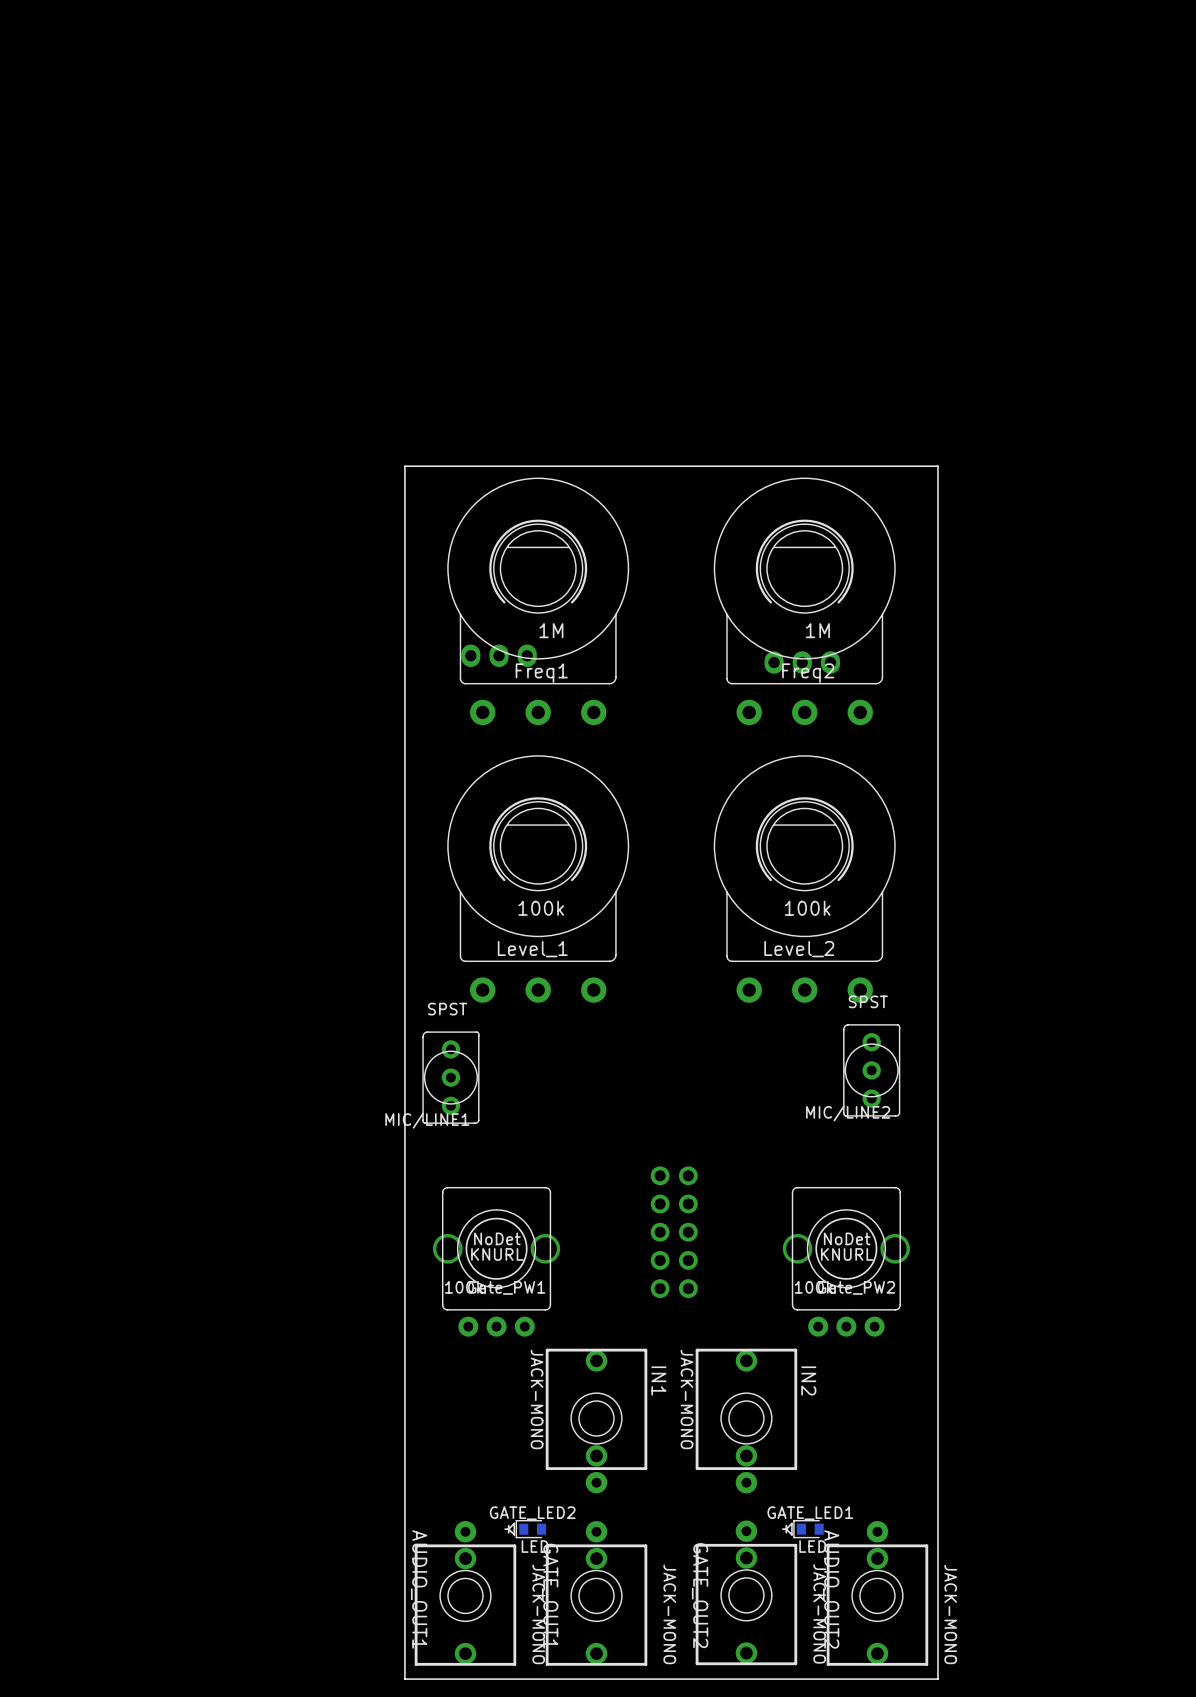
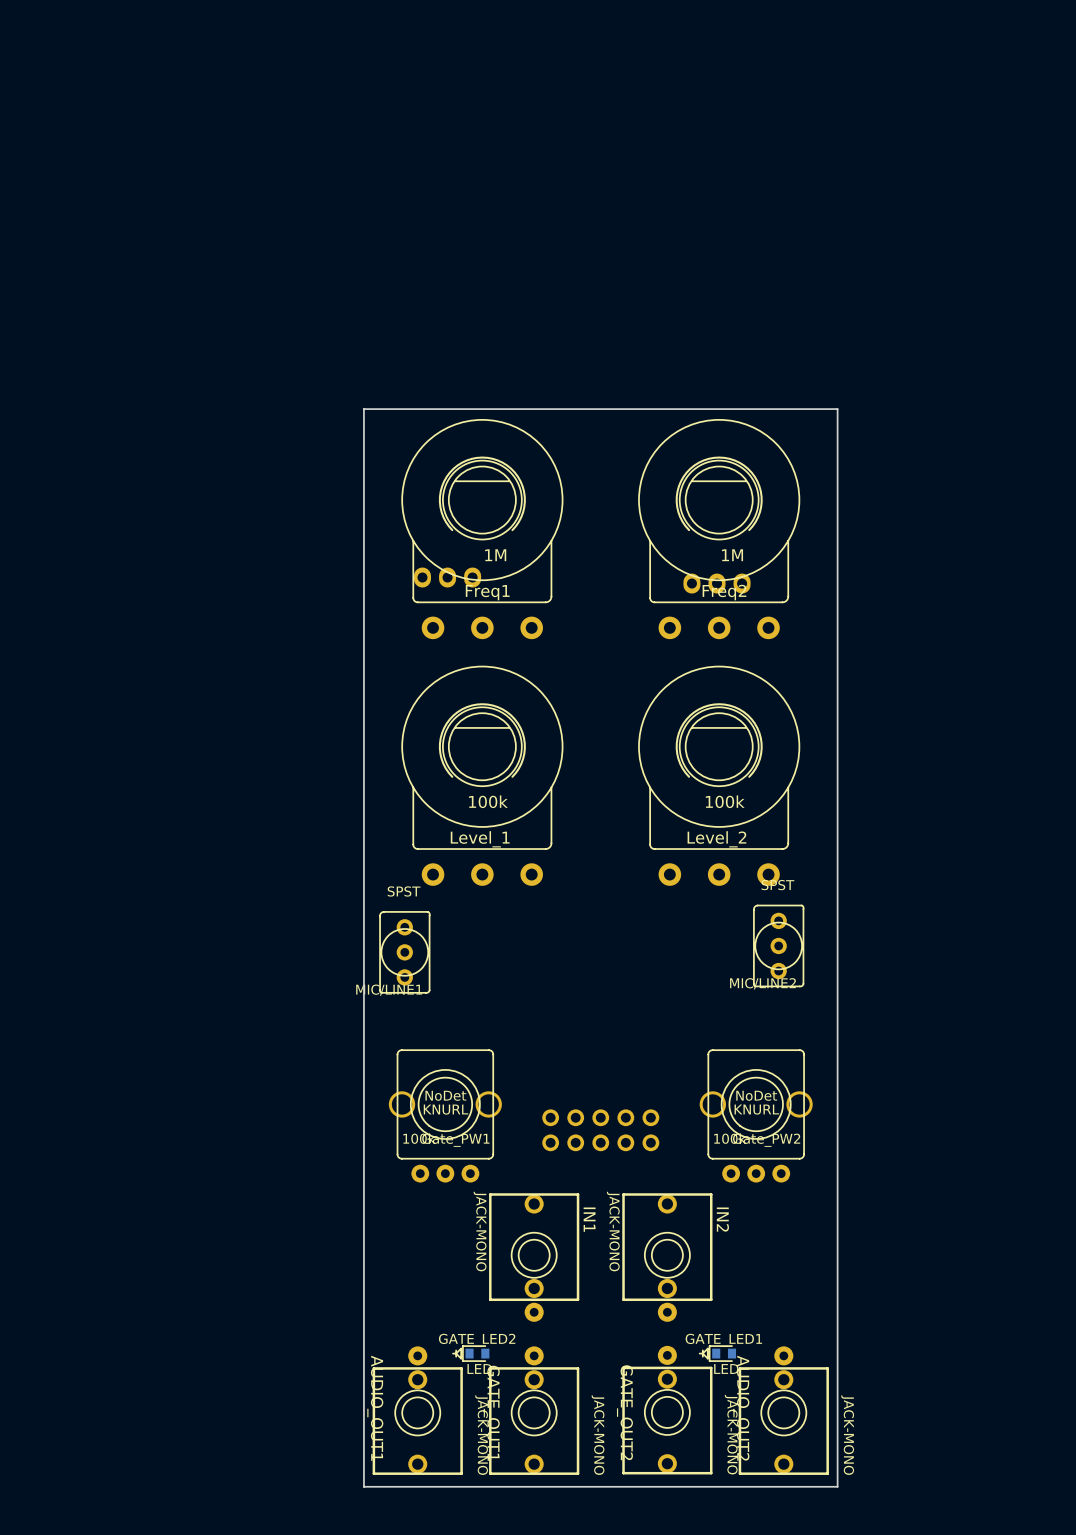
part rotation: 0° (674, 1232) -> 90° clockwise (600, 1130)

